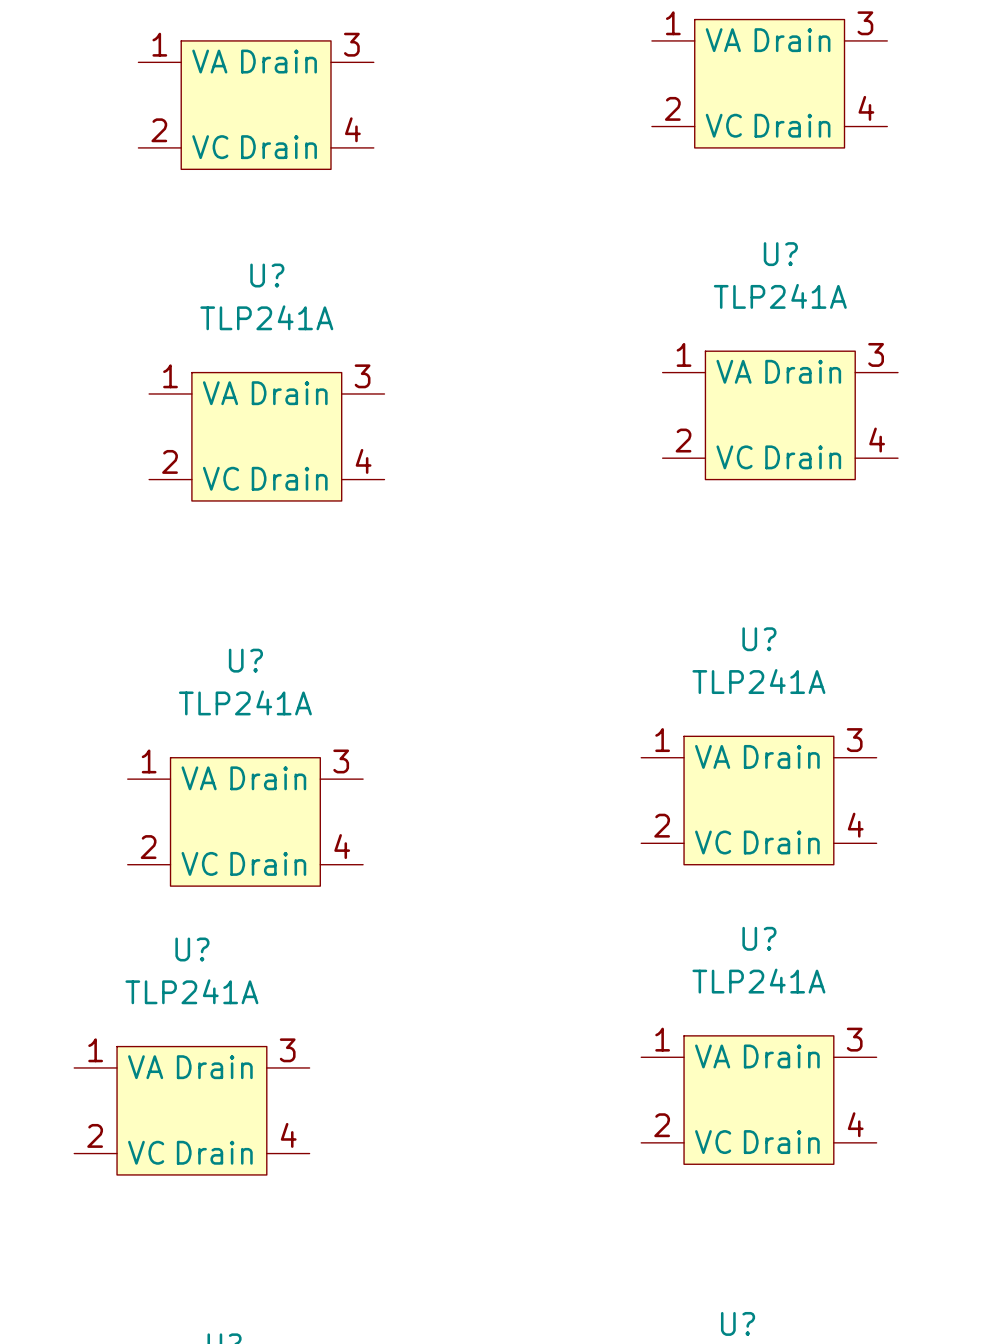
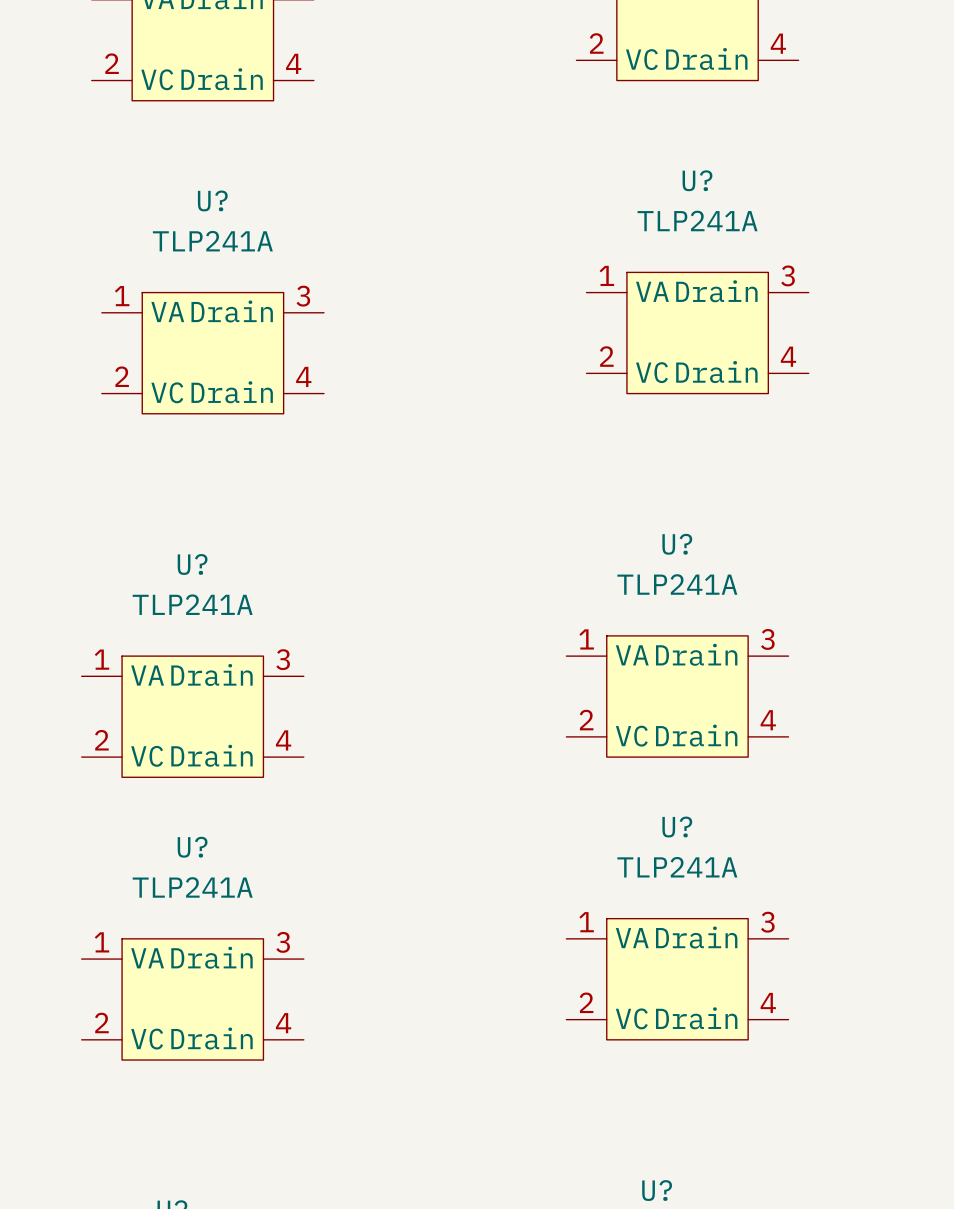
U? position: (191, 1110) -> (192, 999)

